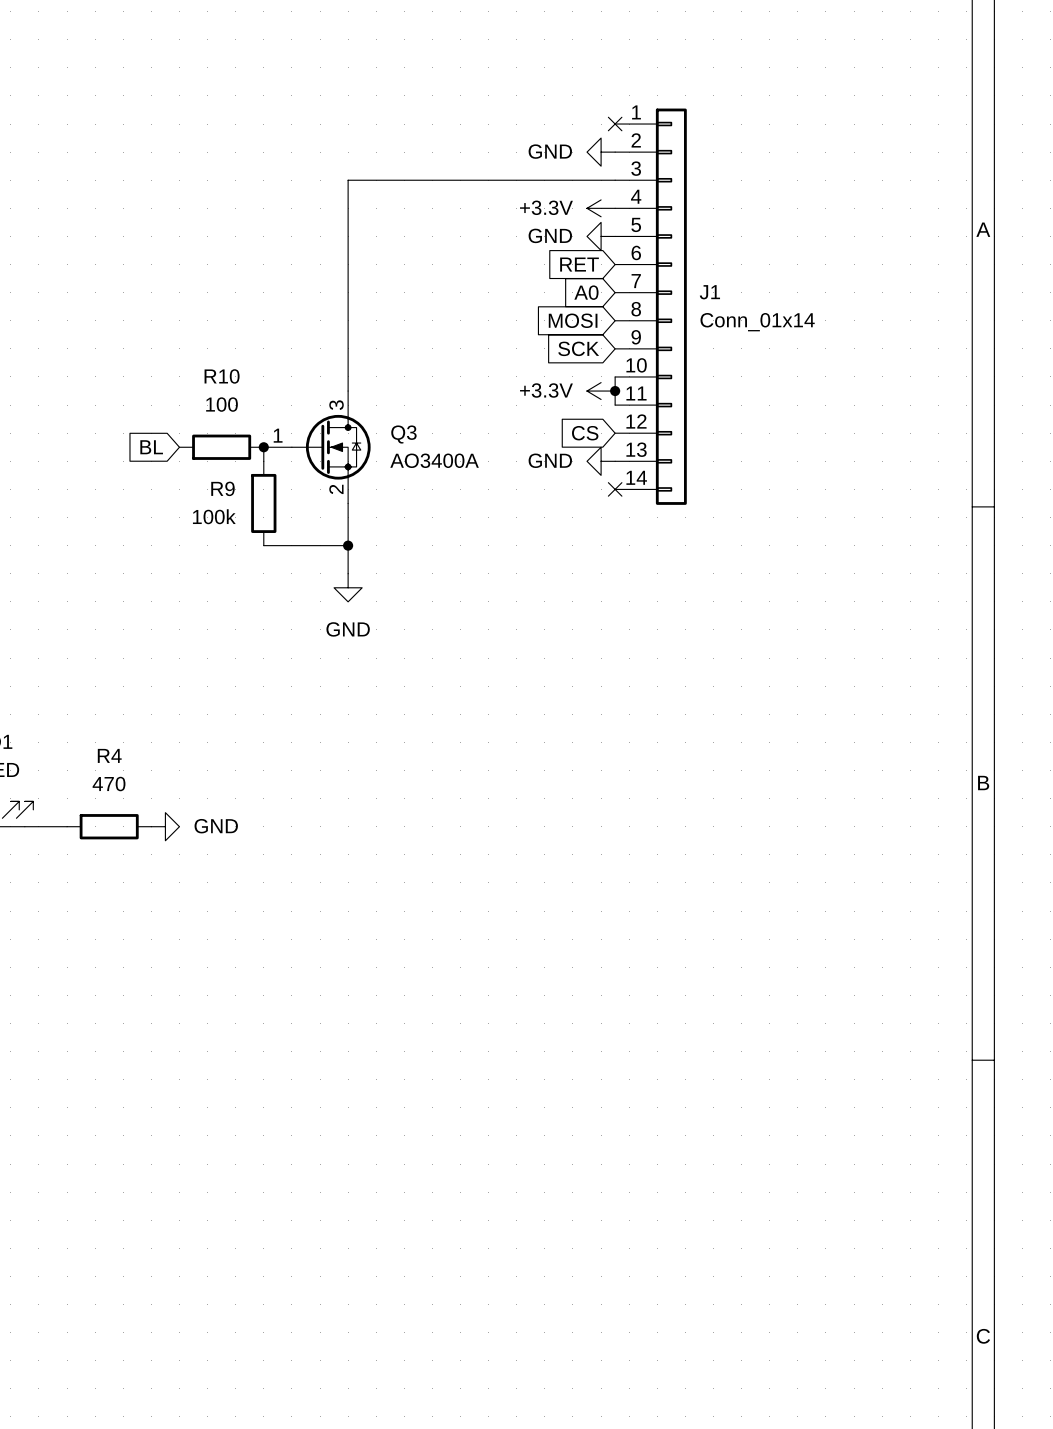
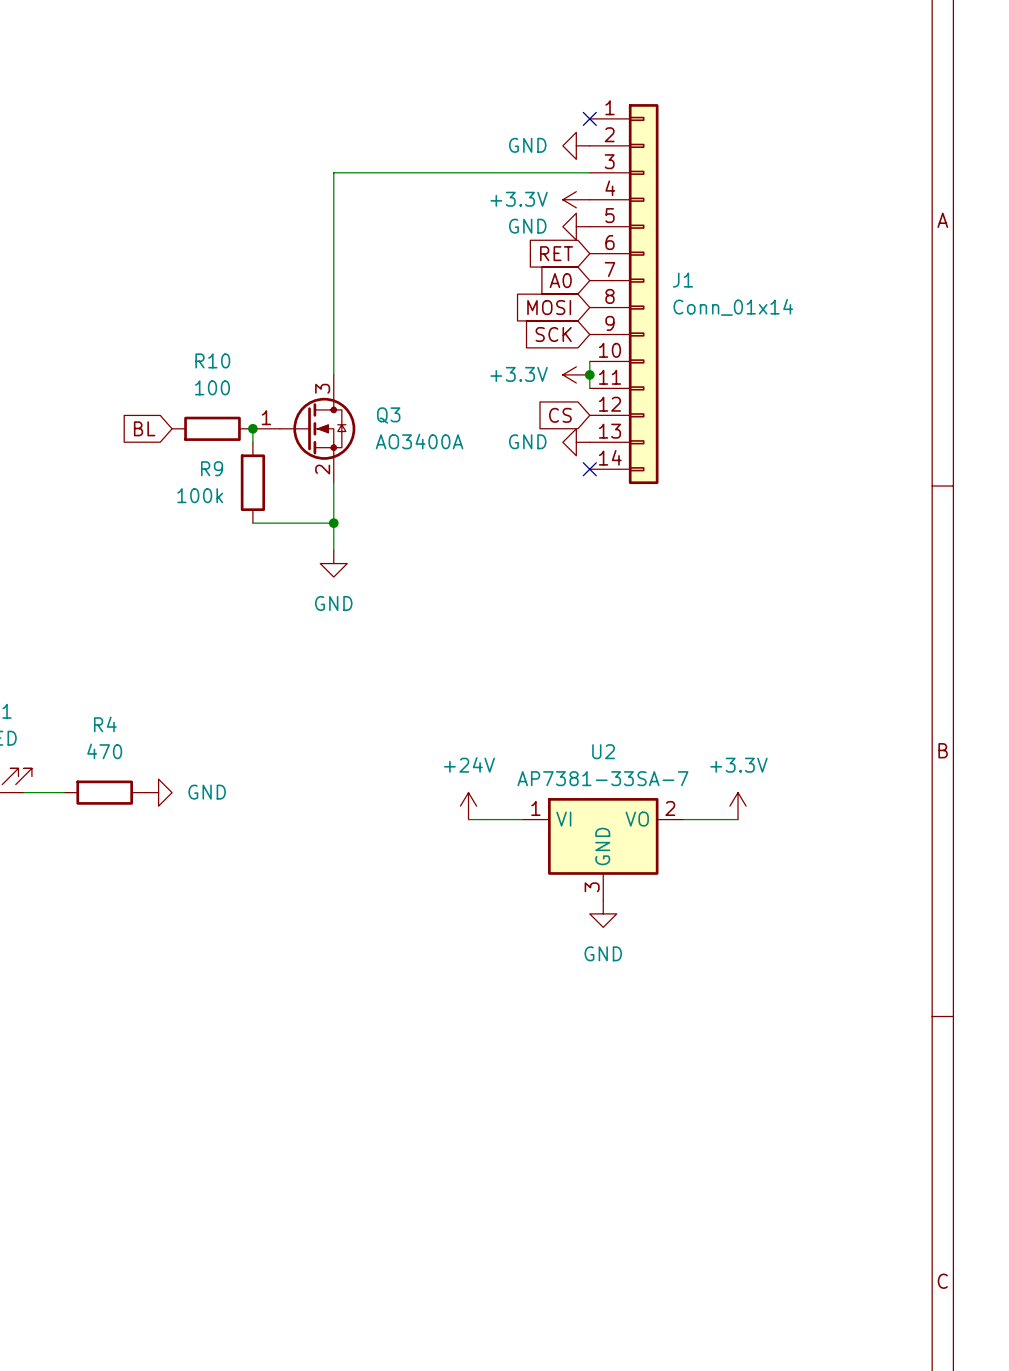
power symbol: none -> +24V (468, 806)
power symbol: none -> +3.3V (738, 806)
wire: none -> (468, 819) (522, 819)
wire: none -> (684, 819) (738, 819)
U2: none -> AP7381-33SA-7 (603, 849)
power symbol: none -> GND (603, 913)

